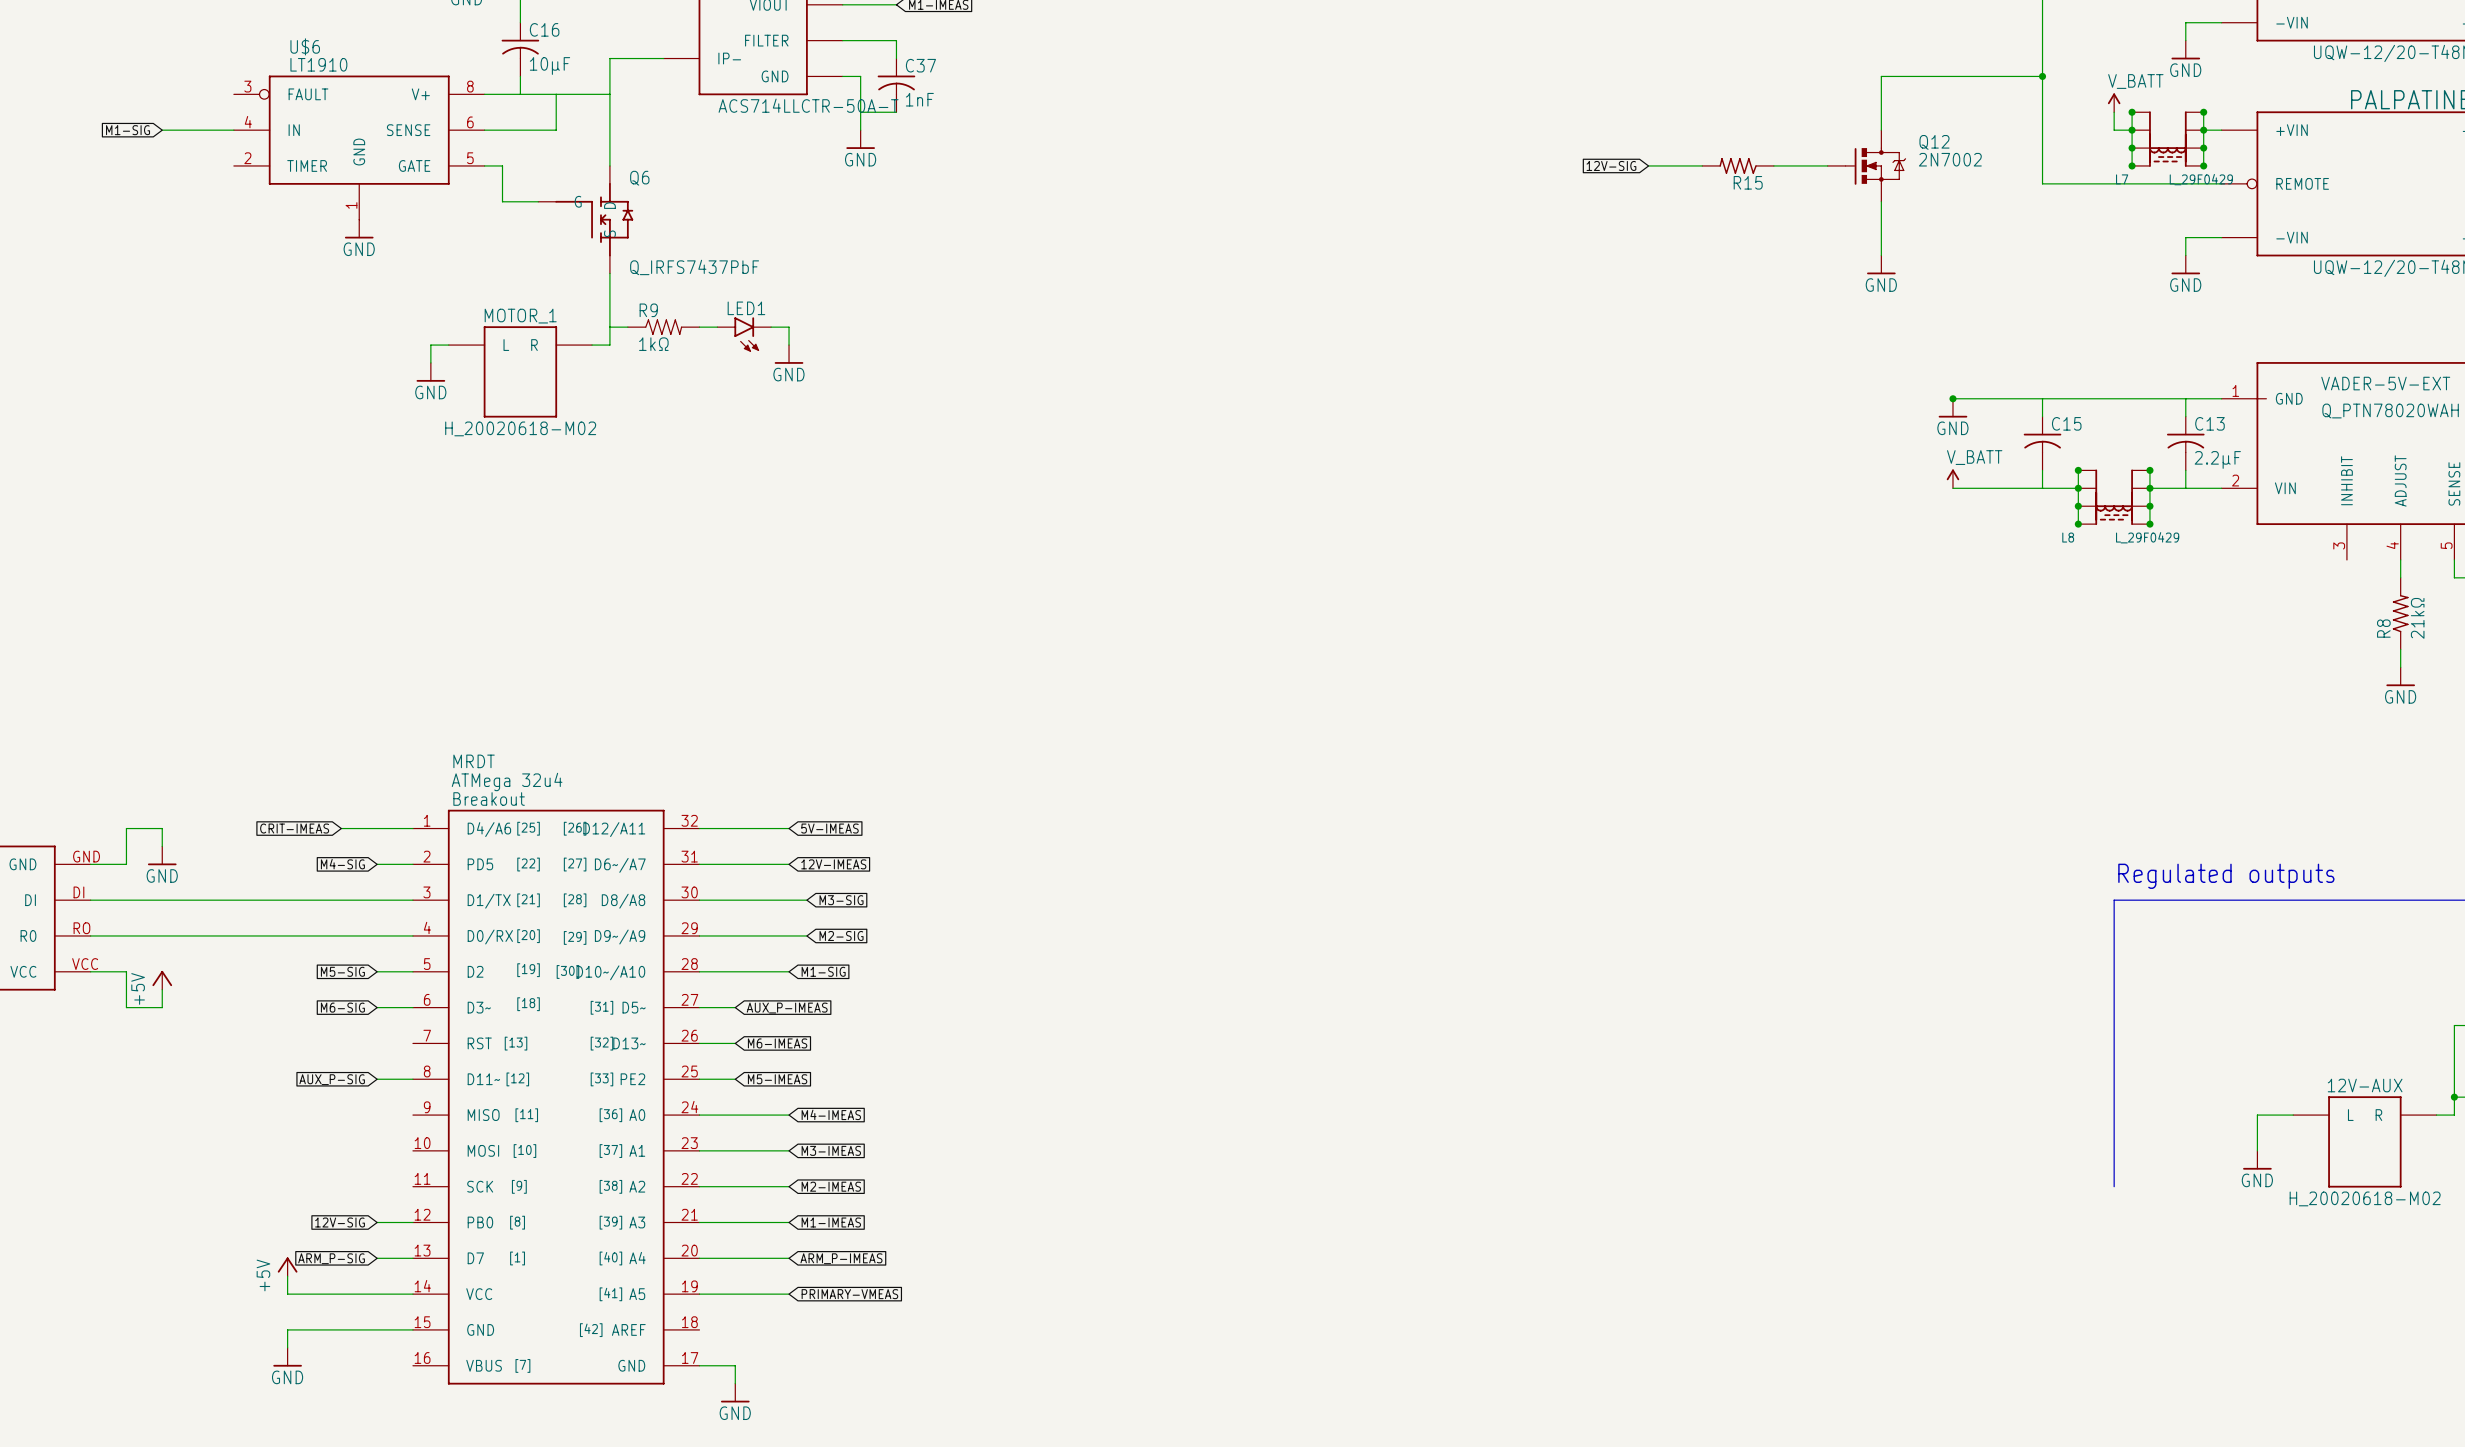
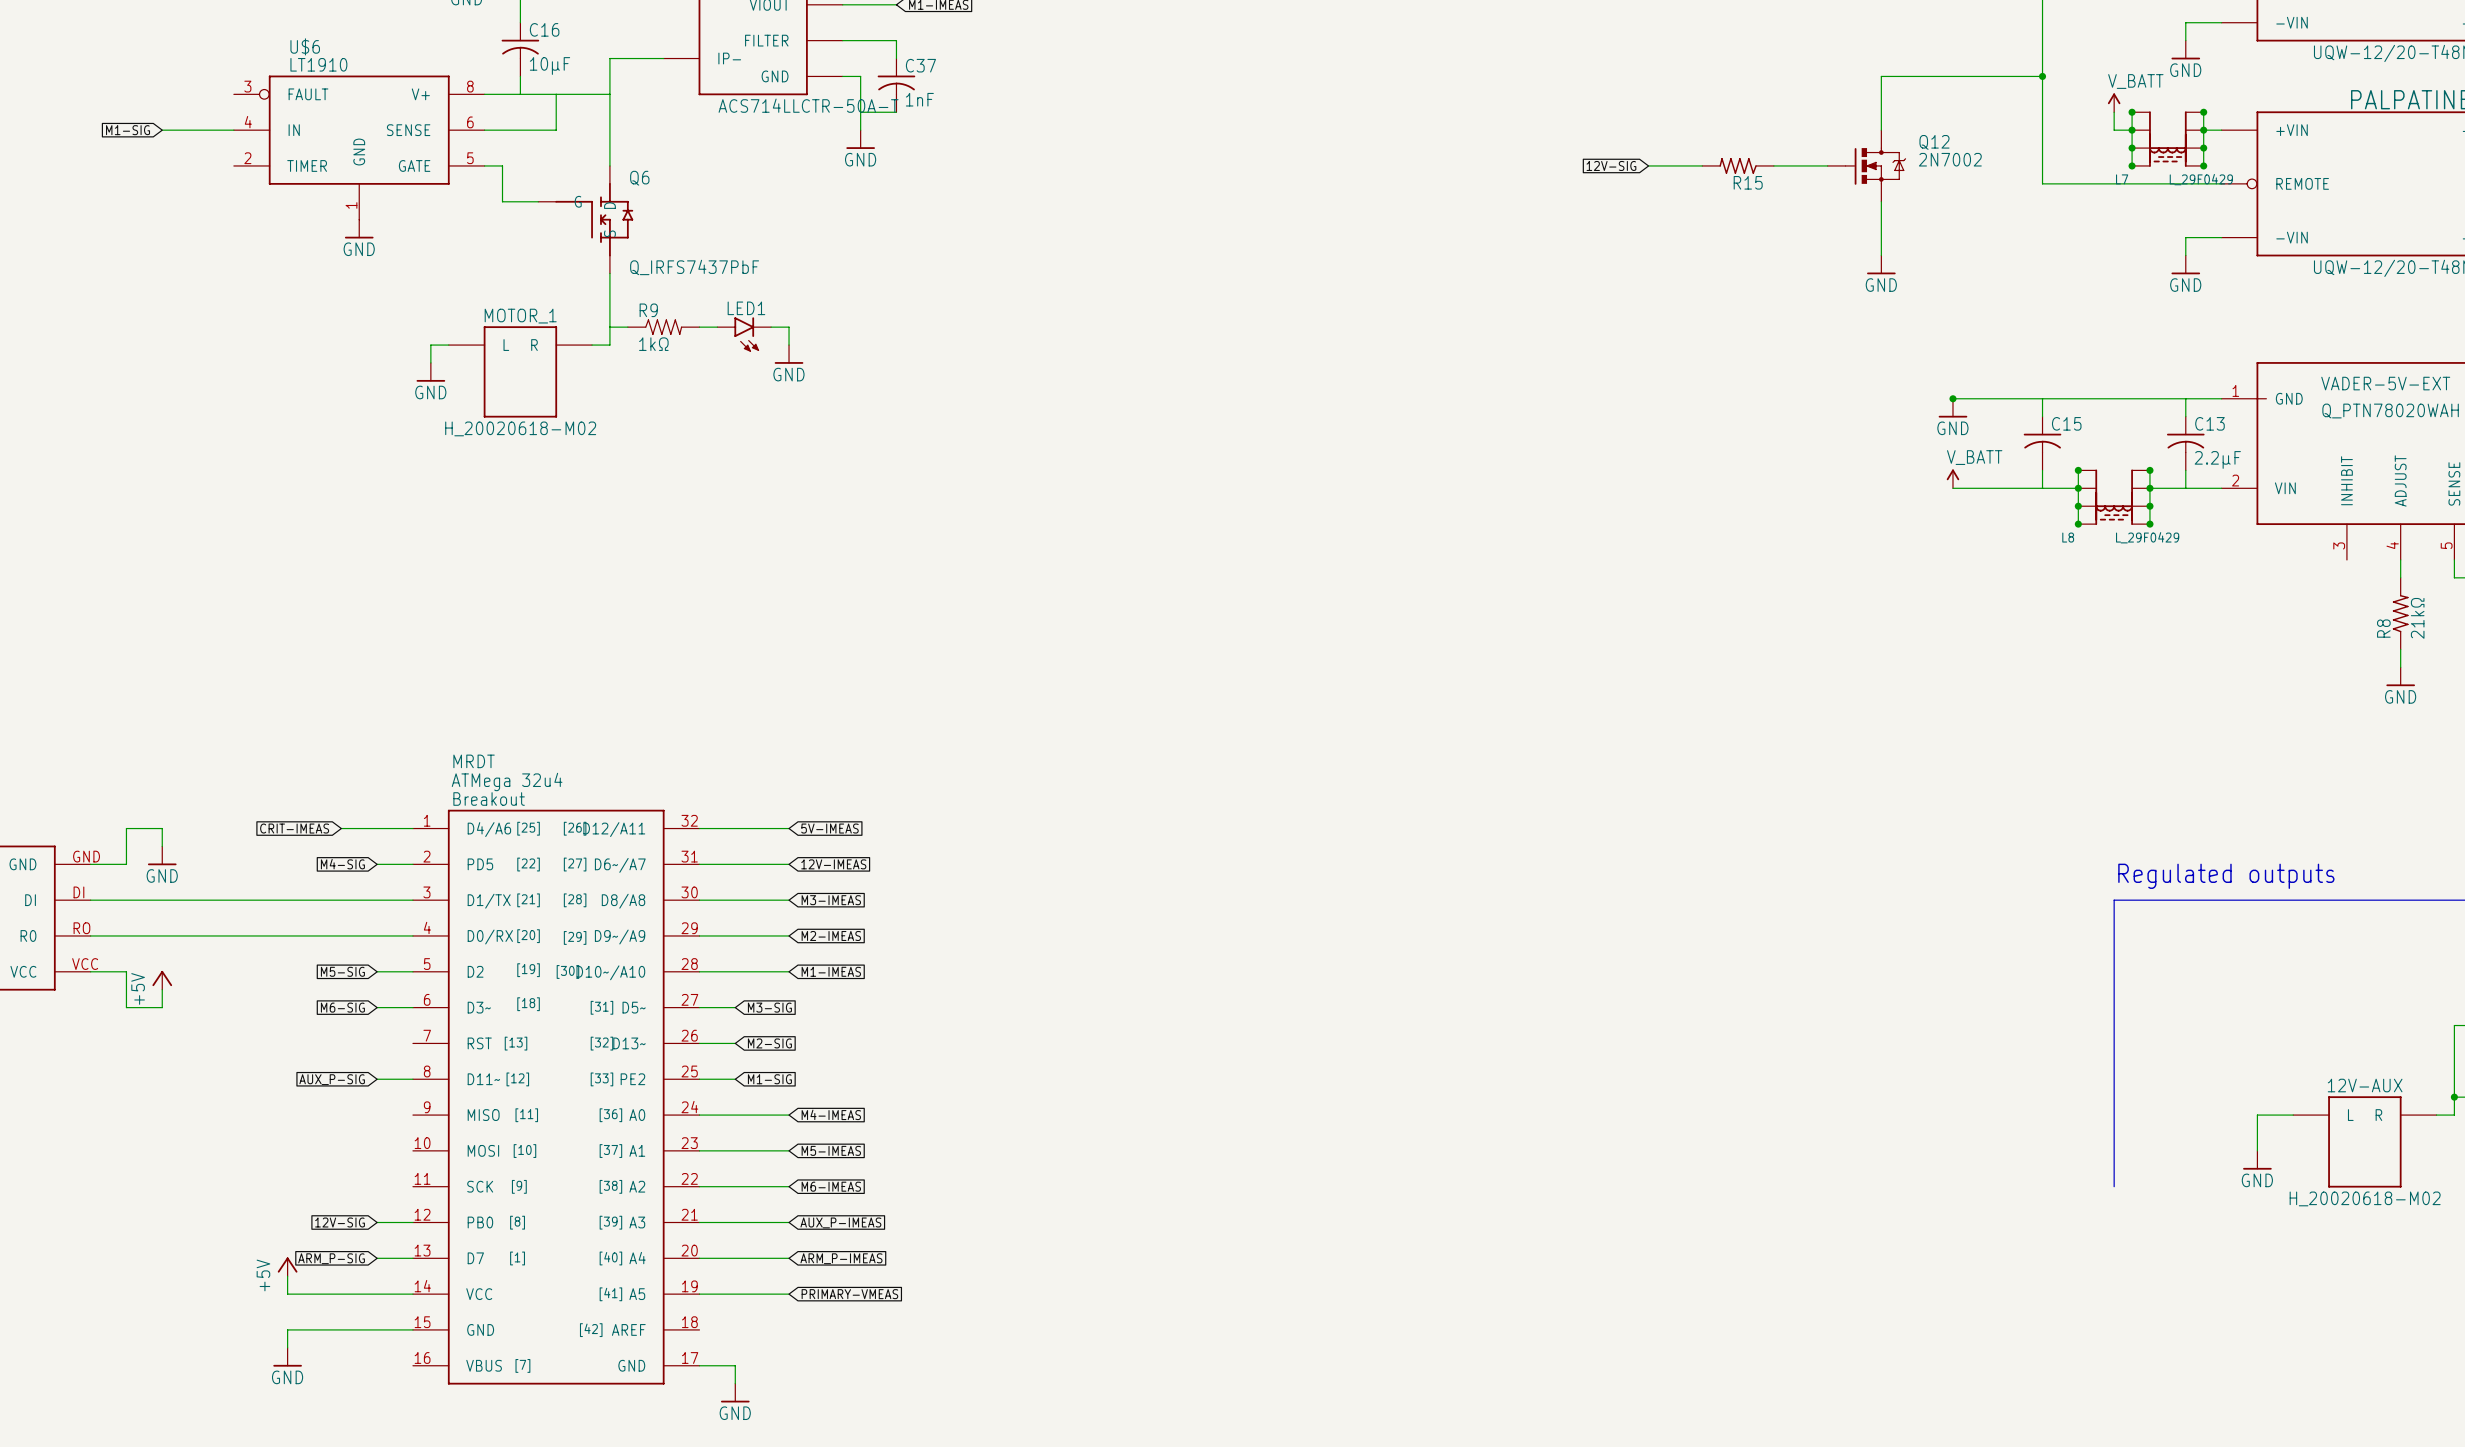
wire: (789, 900) (806, 900) -> none
global label: none -> M3-IMEAS (831, 900)
global label: M3-SIG (841, 900) -> none
wire: (789, 935) (806, 935) -> none
global label: none -> M2-IMEAS (831, 935)
global label: M2-SIG (841, 935) -> none
global label: M1-SIG (823, 971) -> M1-IMEAS (831, 971)
global label: AUX_P-IMEAS (787, 1008) -> M3-SIG (769, 1007)
global label: M6-IMEAS (777, 1043) -> M2-SIG (769, 1043)
global label: M5-IMEAS (777, 1079) -> M1-SIG (769, 1079)
global label: M3-IMEAS (831, 1150) -> M5-IMEAS (831, 1150)
global label: M2-IMEAS (831, 1186) -> M6-IMEAS (831, 1186)
global label: M1-IMEAS (831, 1222) -> AUX_P-IMEAS (840, 1222)

